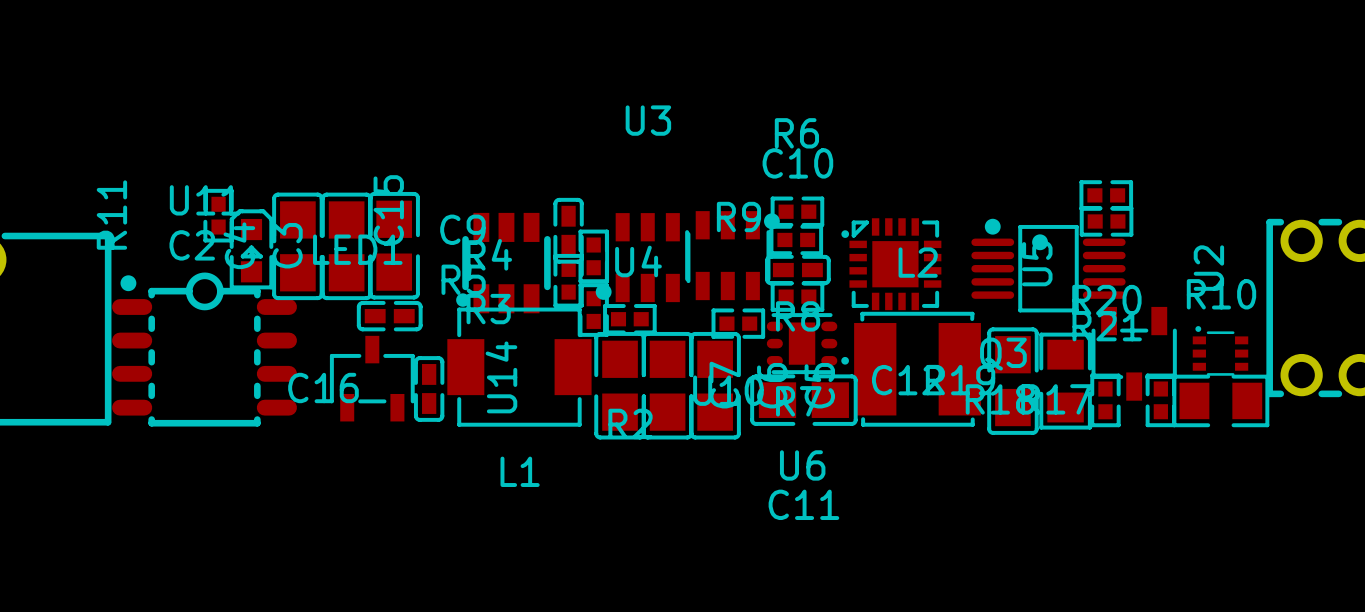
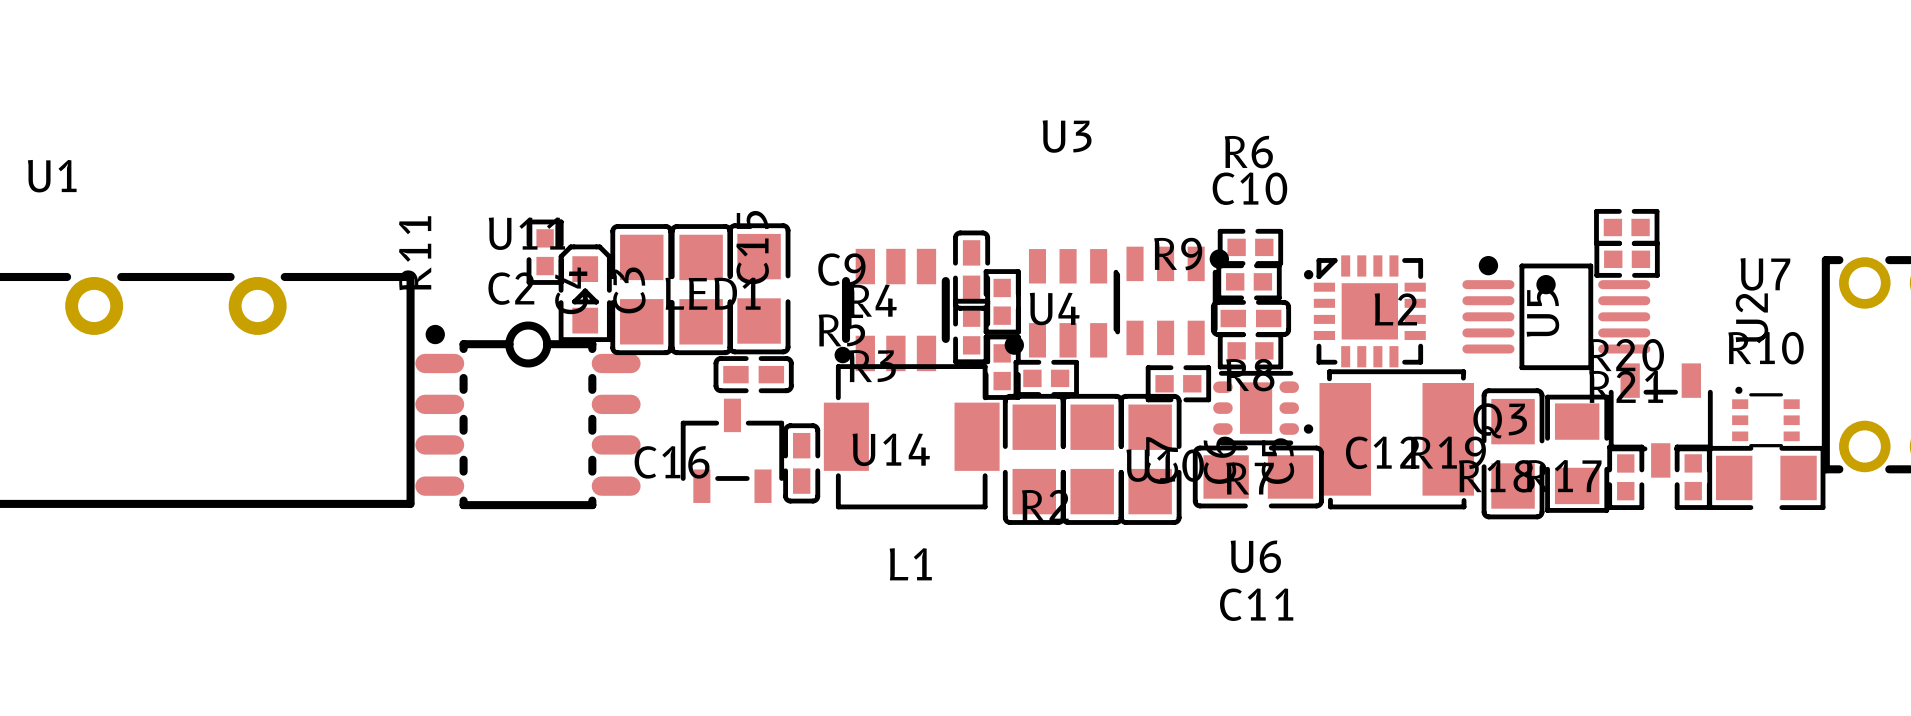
U7 name: none -> U7 (1765, 274)
U14 name rotation: 0° (501, 377) -> 90° clockwise (891, 449)

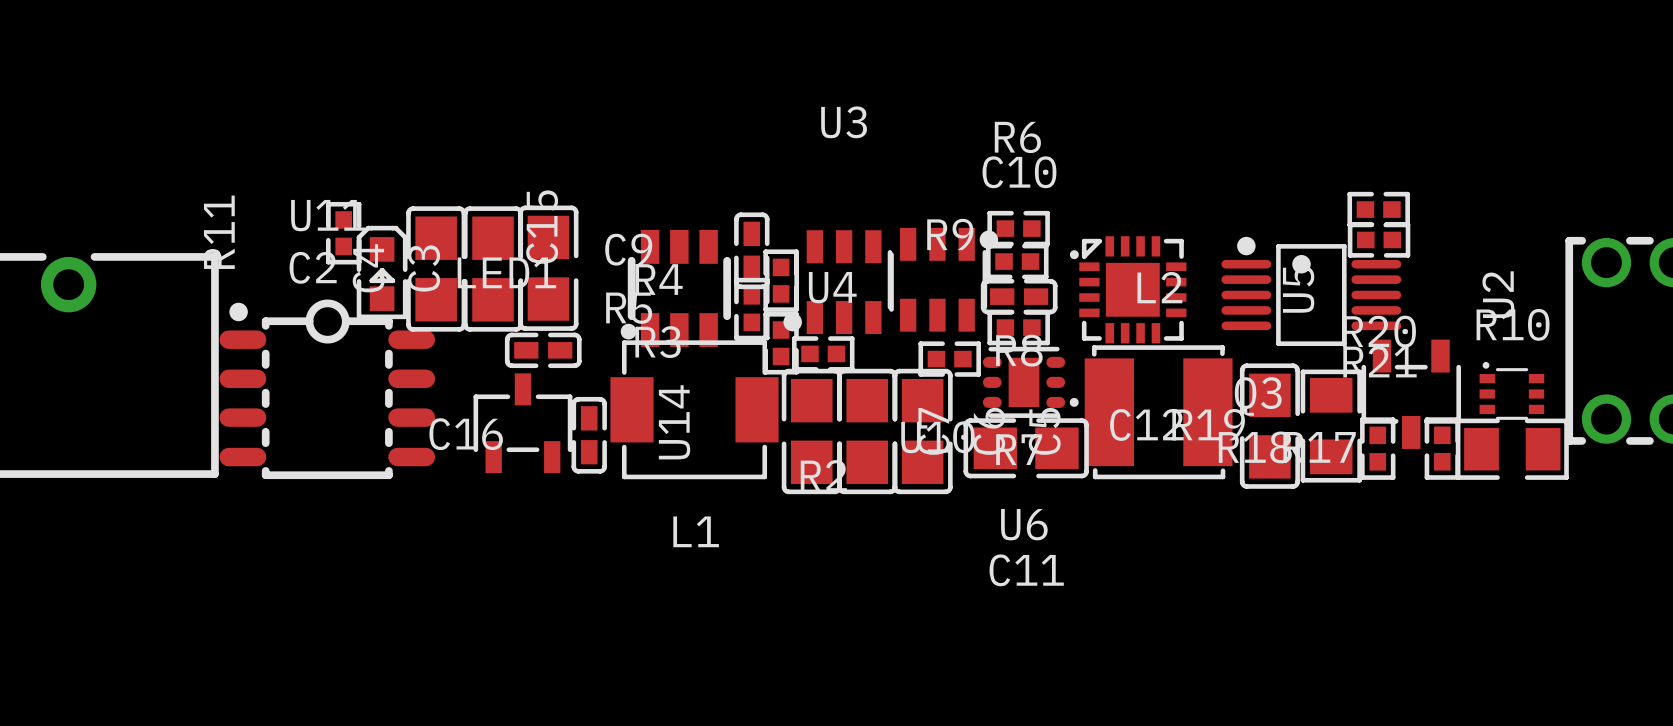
U7 name: U7 (1765, 274) -> none
U14 name rotation: 0° (891, 449) -> 90° counterclockwise (674, 422)

